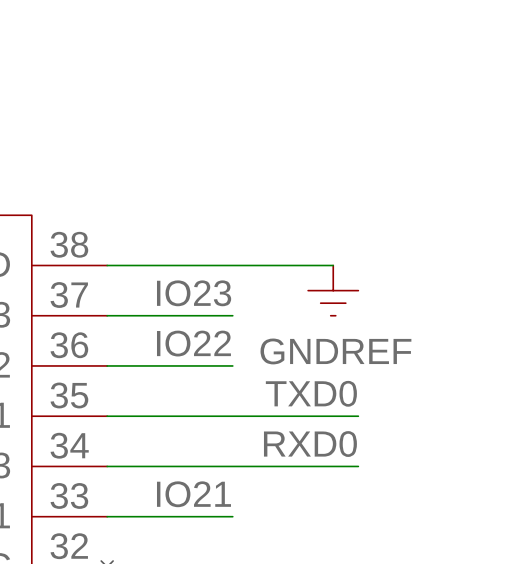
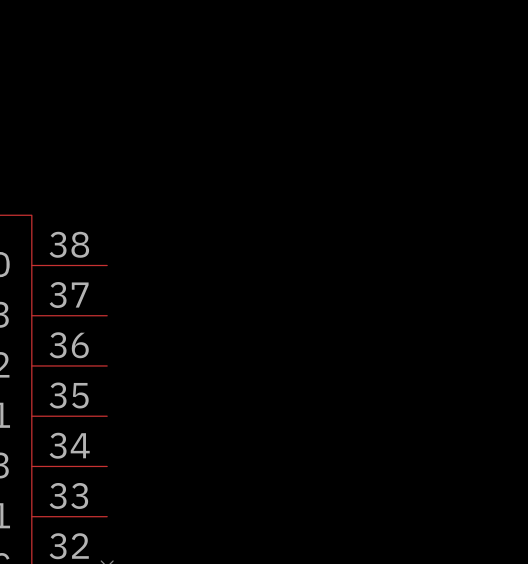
wire: (107, 265) (333, 265) -> none
power symbol: GNDREF (333, 290) -> none
label: IO23 (194, 293) -> none
wire: (107, 315) (232, 315) -> none
label: IO22 (193, 343) -> none
wire: (107, 365) (232, 365) -> none
label: TXD0 (311, 393) -> none
wire: (107, 416) (358, 416) -> none
label: RXD0 (310, 444) -> none
wire: (107, 466) (358, 466) -> none
label: IO21 (193, 494) -> none
wire: (107, 516) (232, 516) -> none

